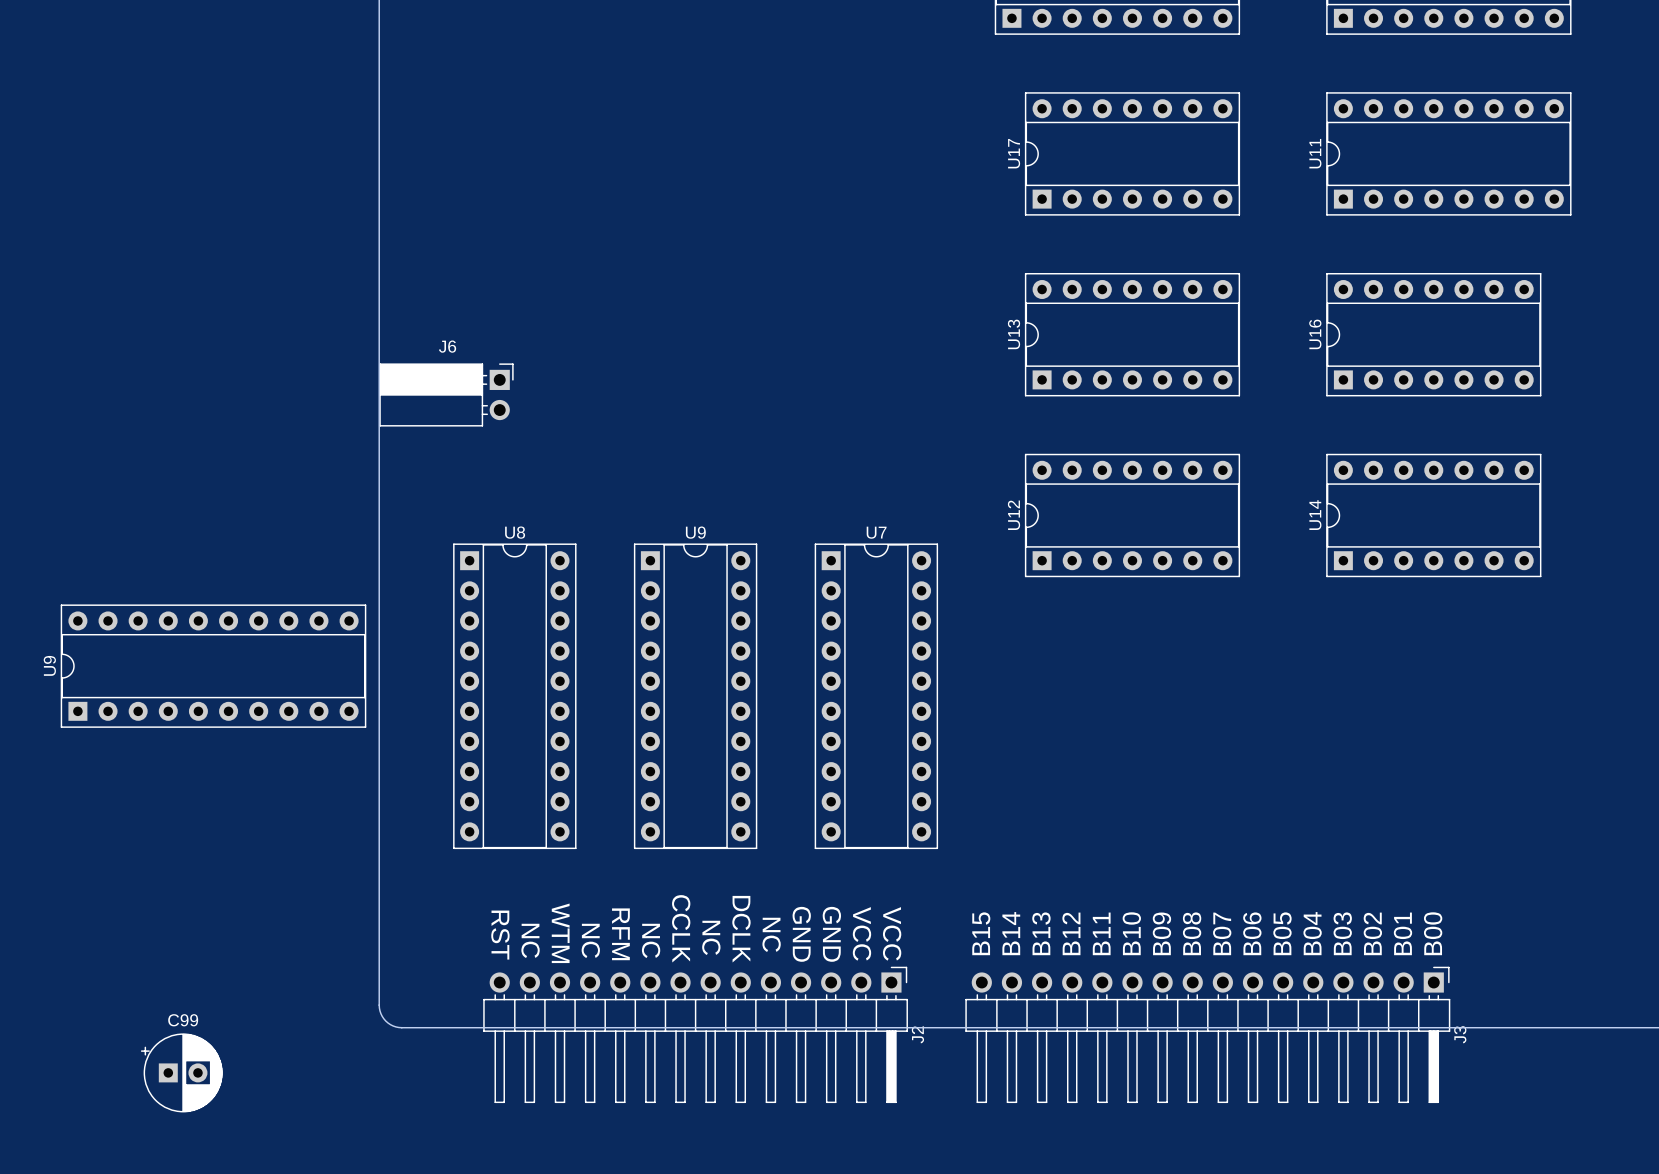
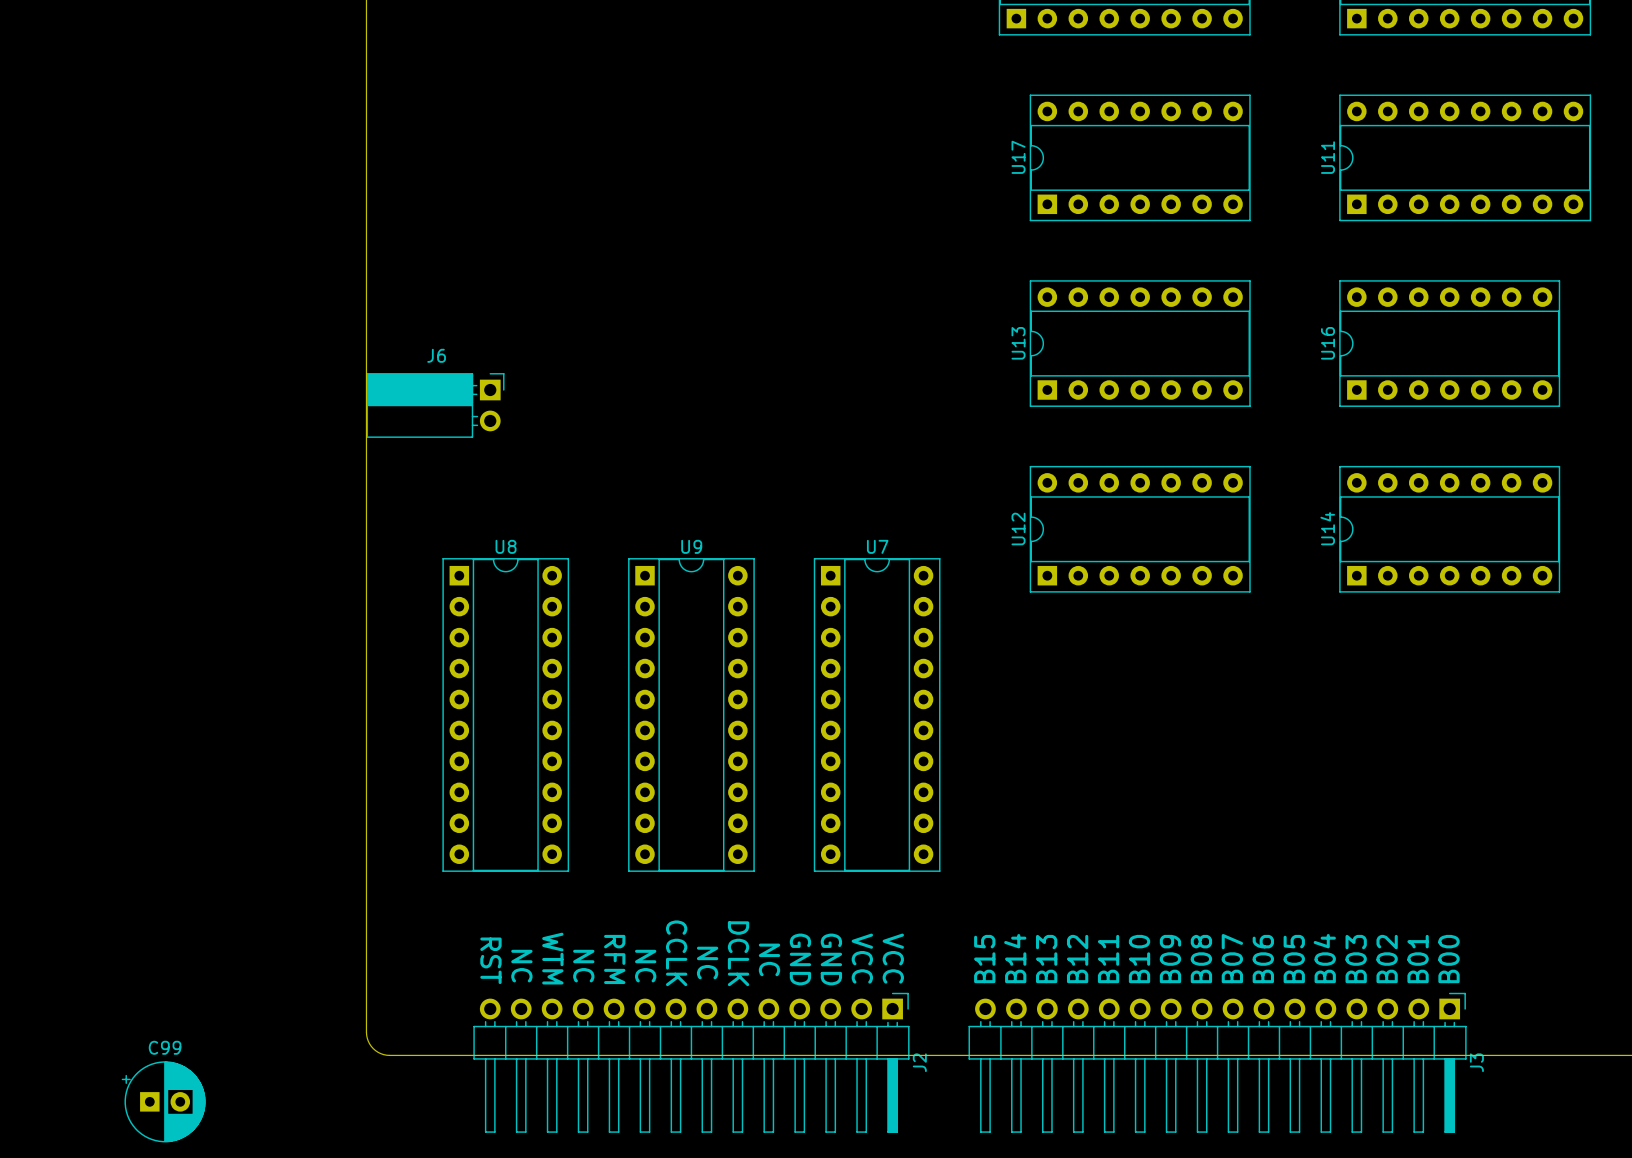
U9: (213, 666) -> none

